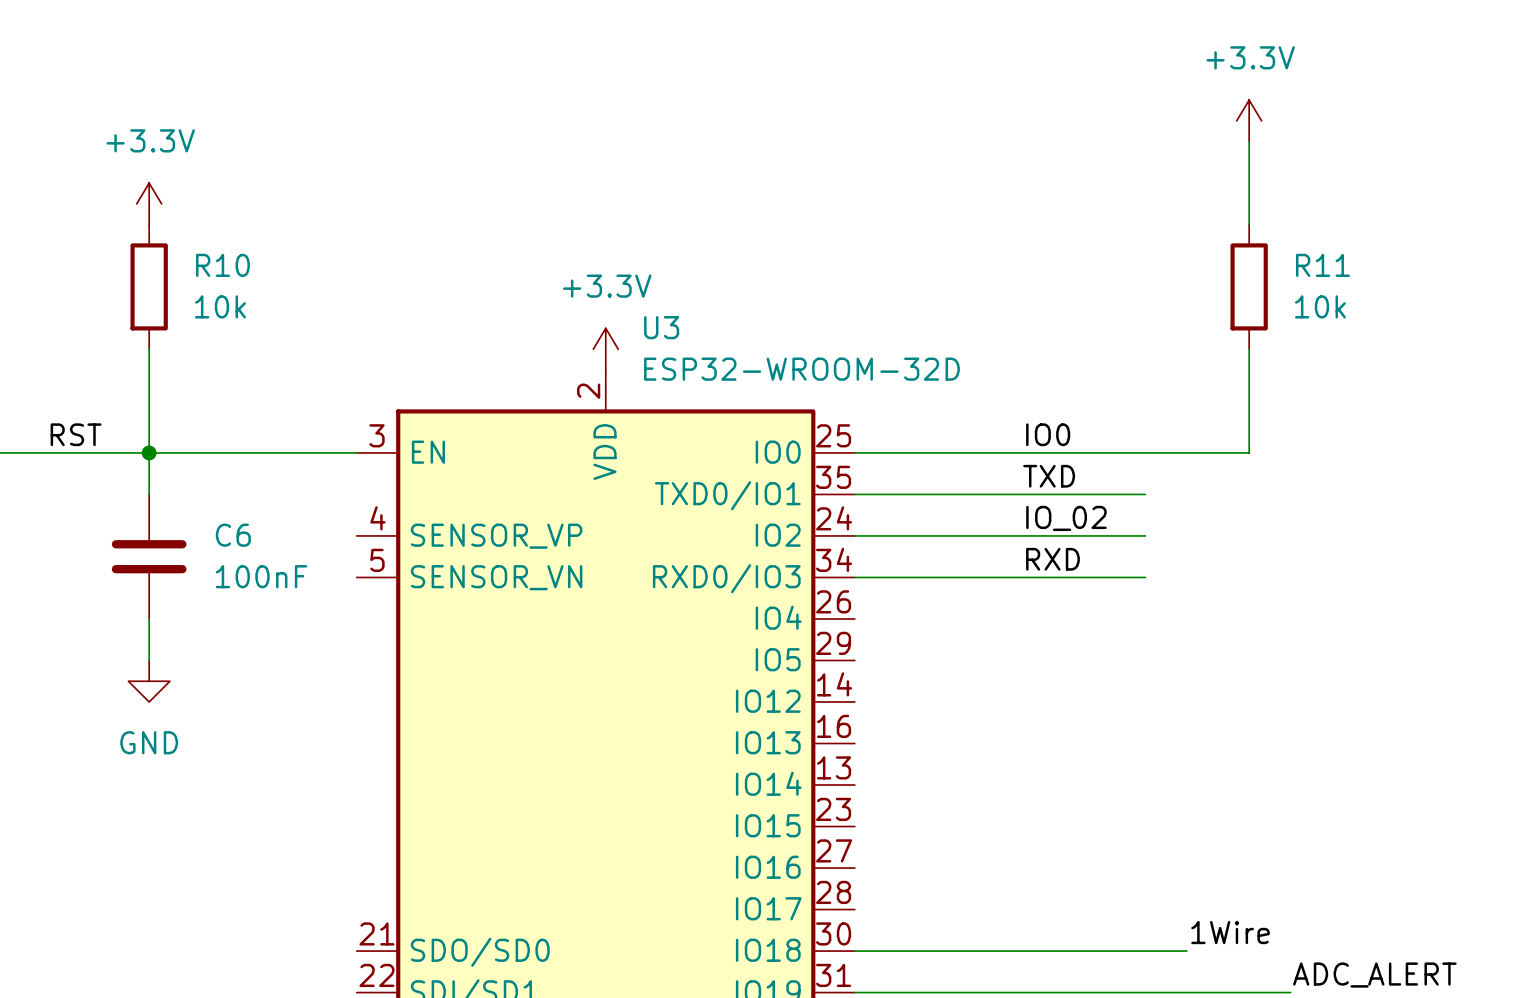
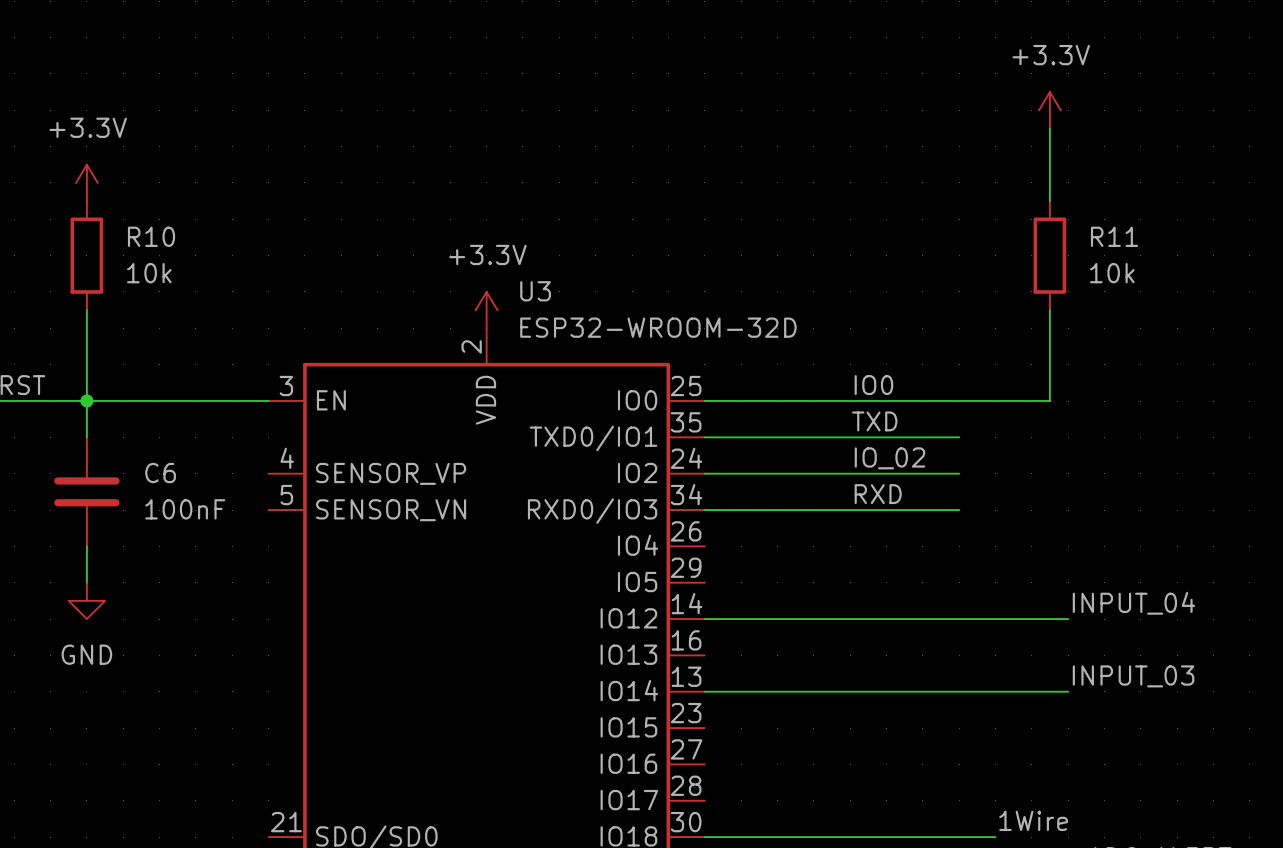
label: none -> INPUT_04 (1133, 603)
wire: none -> (704, 619) (1068, 619)
label: none -> INPUT_03 (1133, 676)
wire: none -> (704, 691) (1068, 691)

